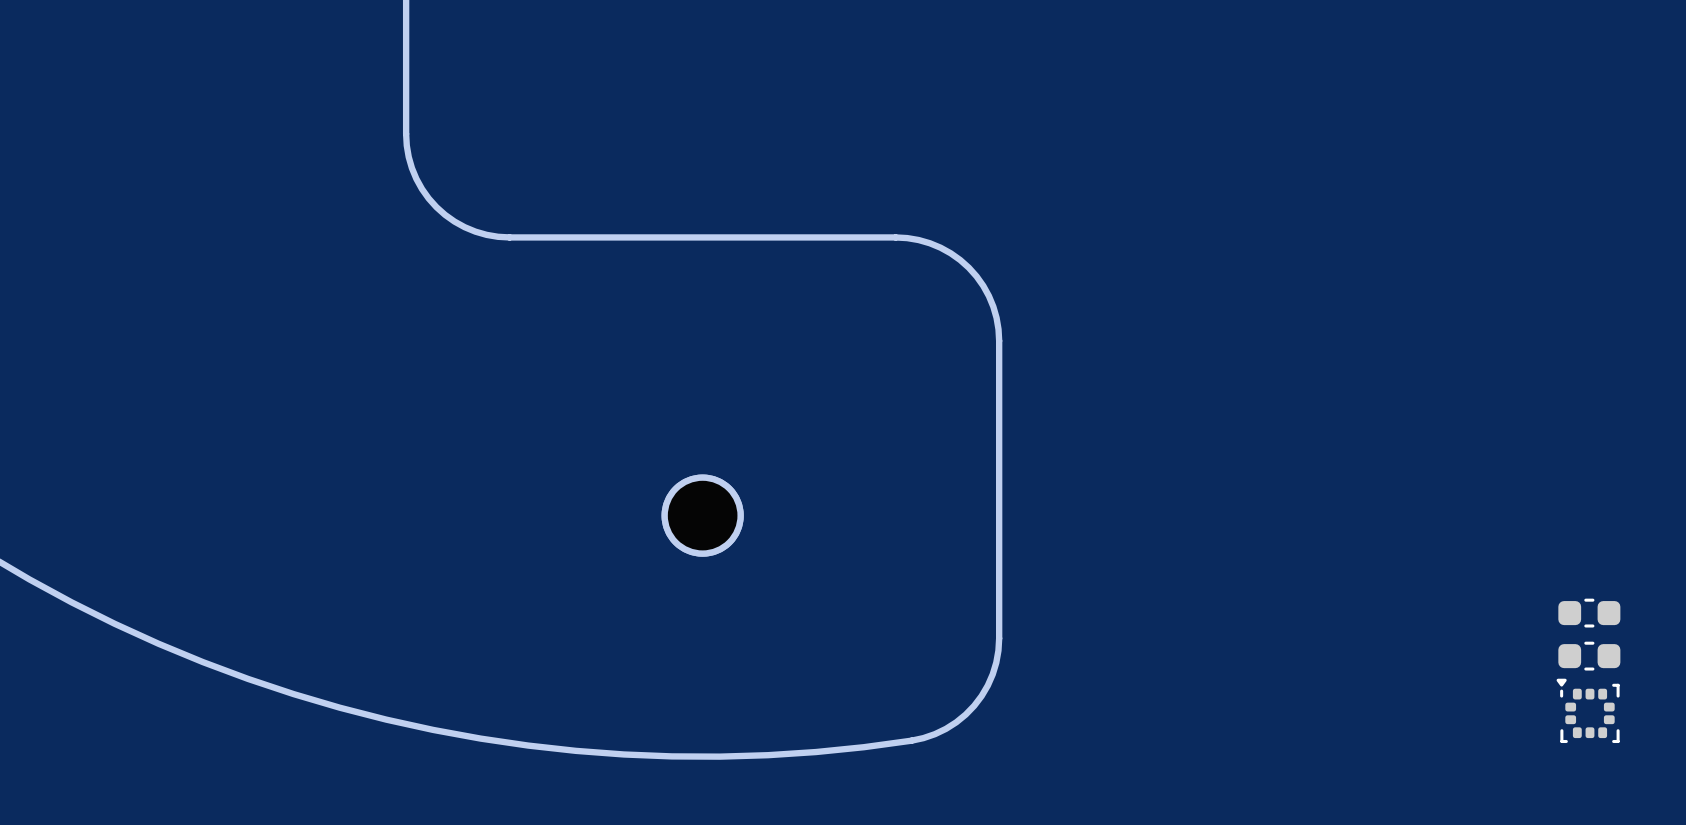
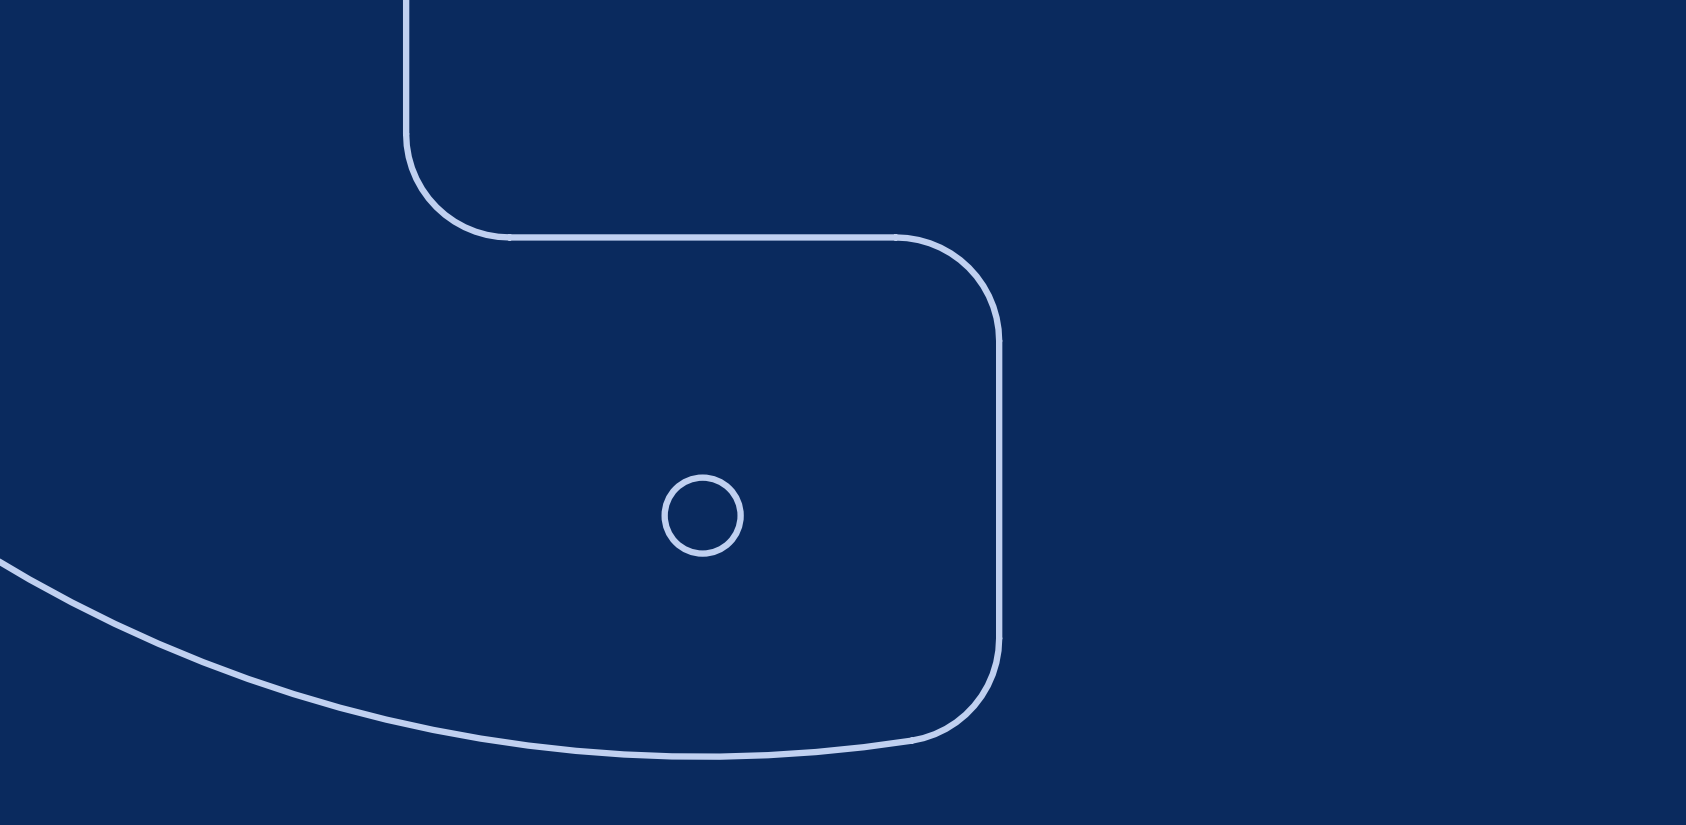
part: (702, 515) -> none
part: (1589, 613) -> none
part: (1589, 656) -> none
part: (1588, 710) -> none

